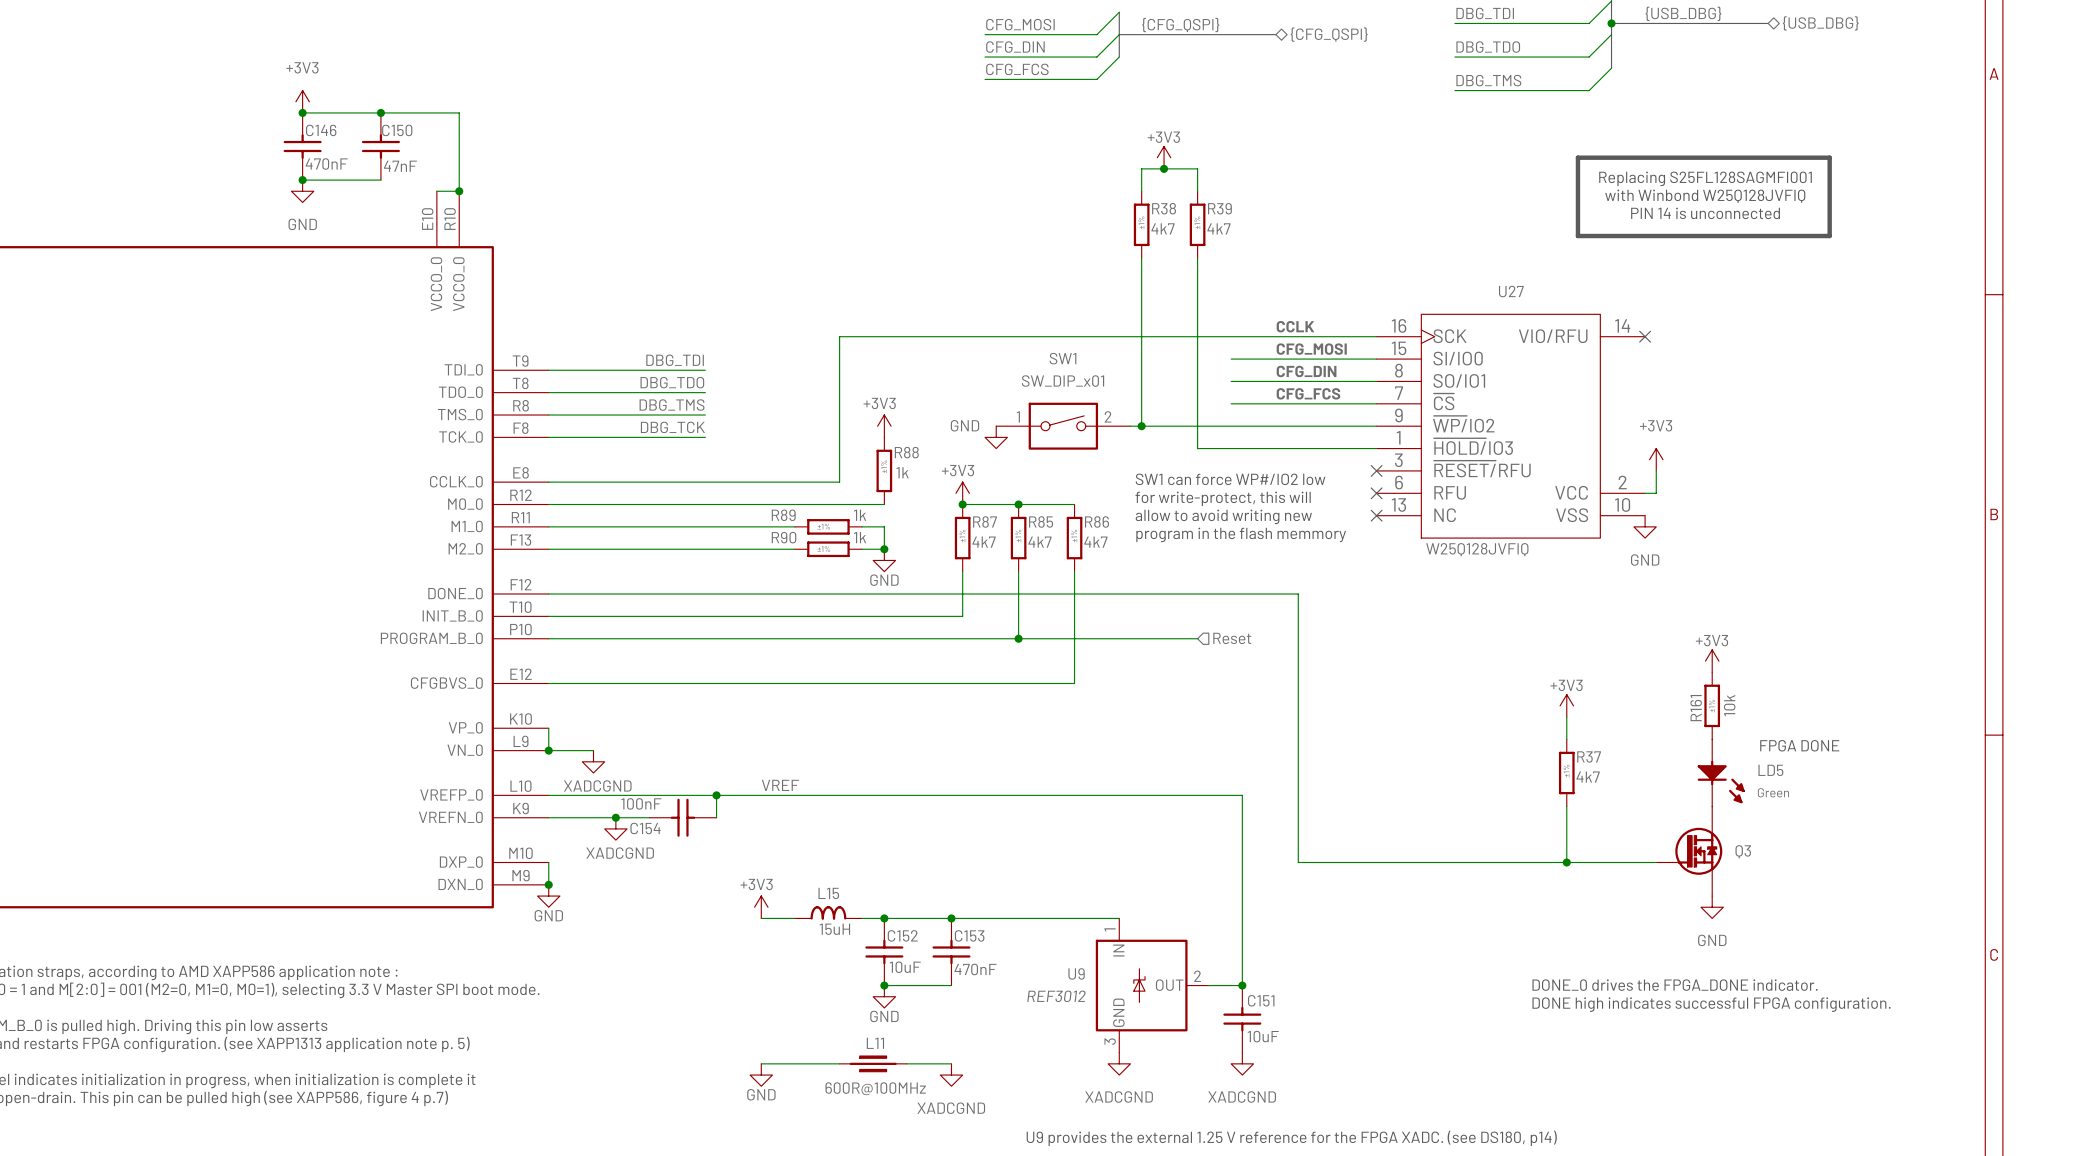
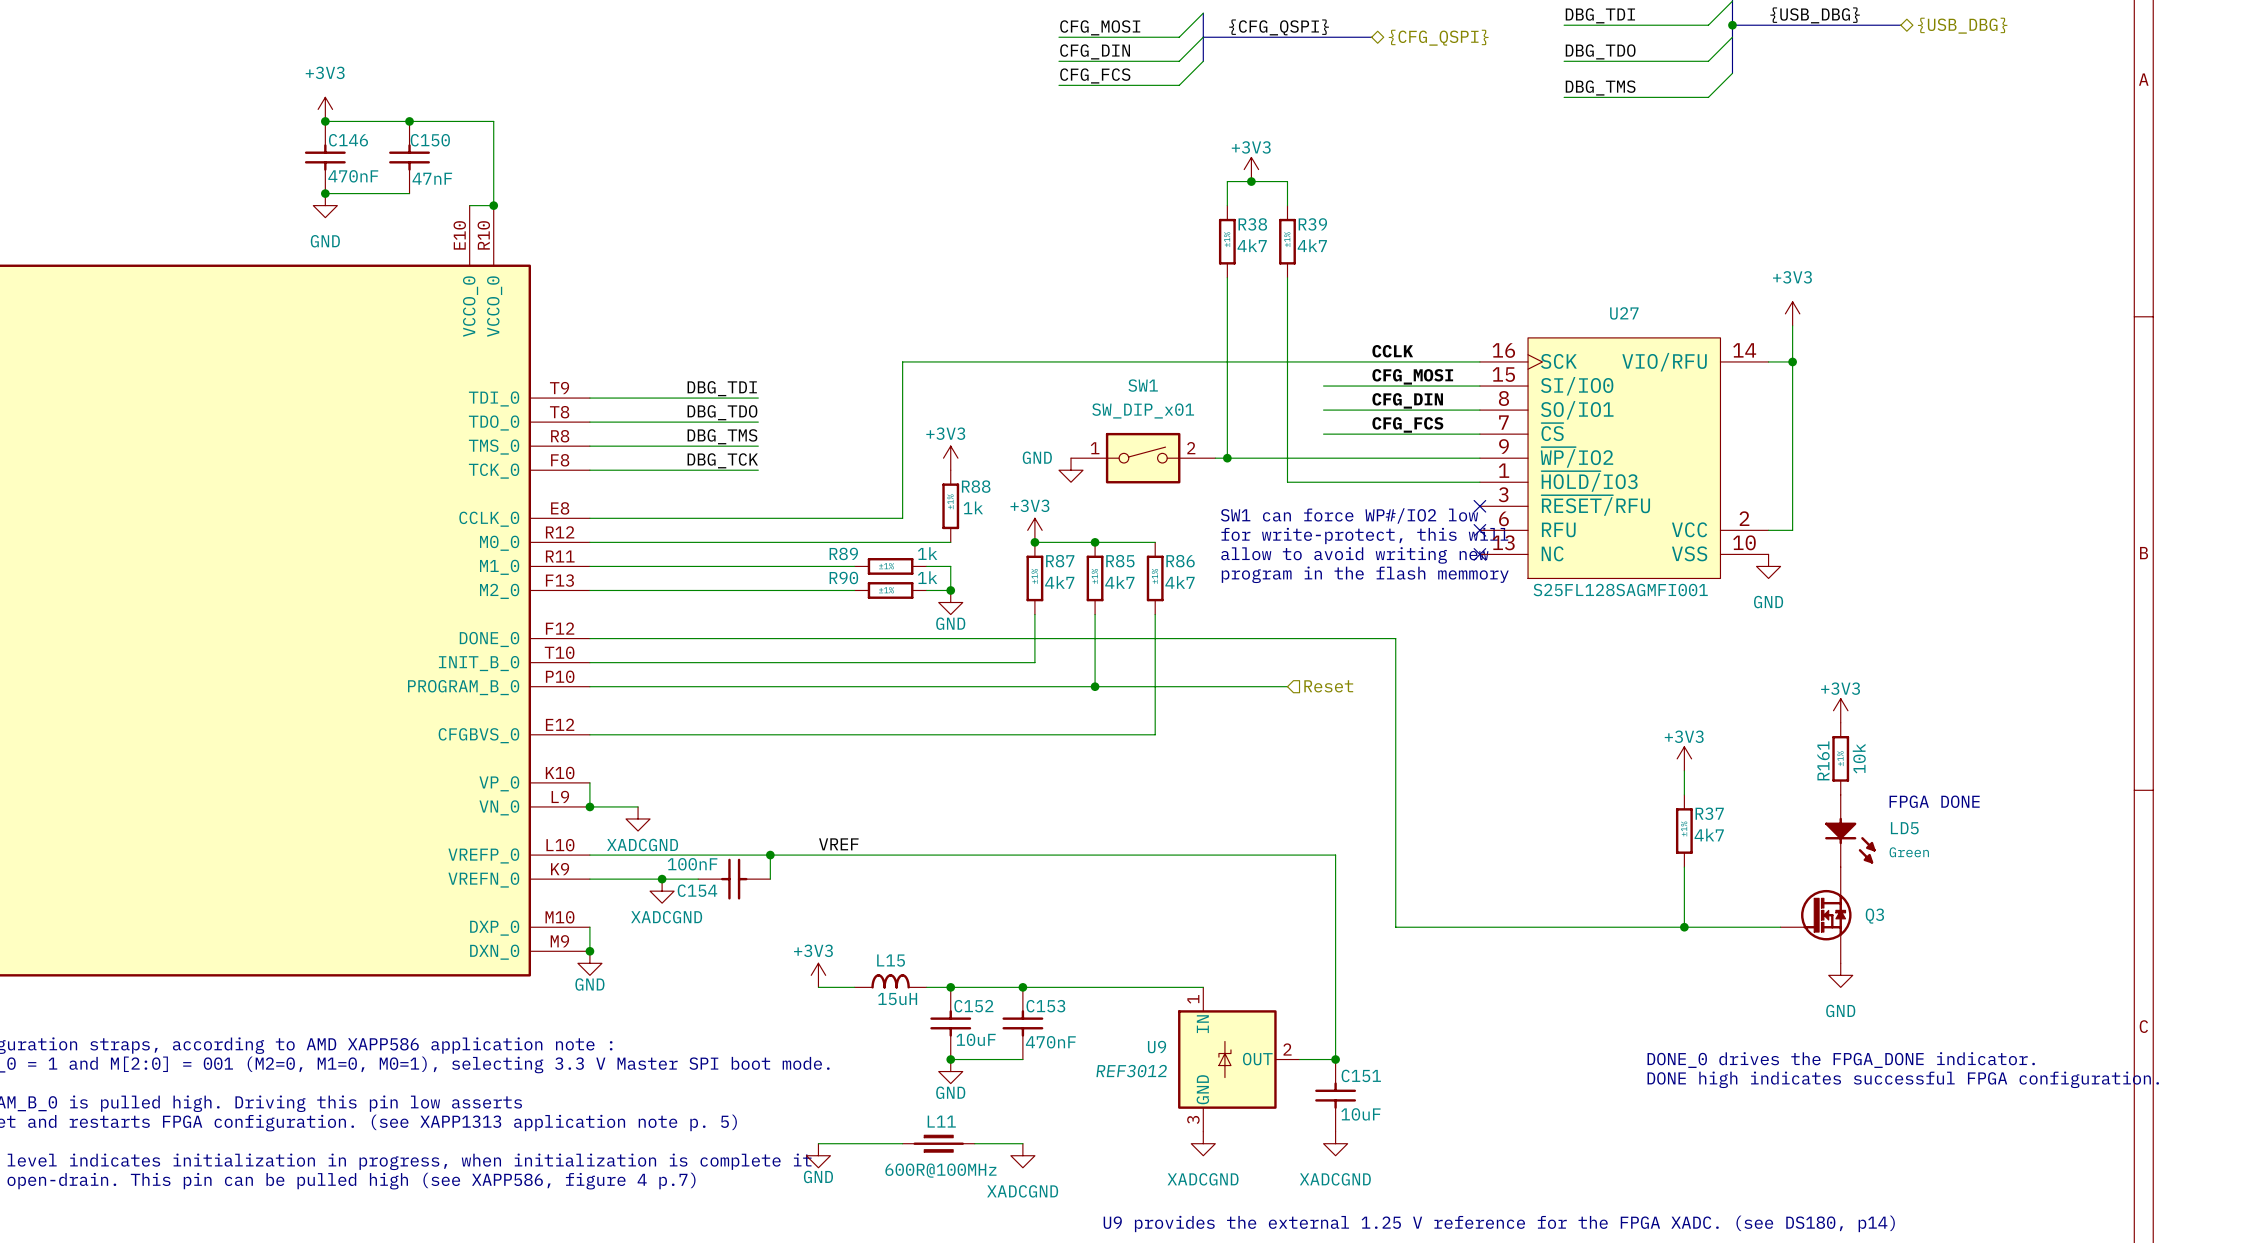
line: (1577, 157) (1829, 157) (1829, 236) (1577, 236) (1577, 157) -> none
text: Replacing S25FL128SAGMFI001 (1705, 178) -> none
text: with Winbond W25Q128JVFIQ (1705, 196) -> none
text: PIN 14 is unconnected (1705, 213) -> none
wire: none -> (1768, 361) (1792, 361)
no-connect mark: (1645, 336) -> none
junction: none -> (1792, 361)
power symbol position: +3V3 (1656, 459) -> +3V3 (1792, 313)
wire: (1656, 470) (1656, 493) -> (1792, 325) (1792, 530) (1780, 530)
U27 value: W25Q128JVFIQ (1477, 549) -> S25FL128SAGMFI001 (1620, 590)

